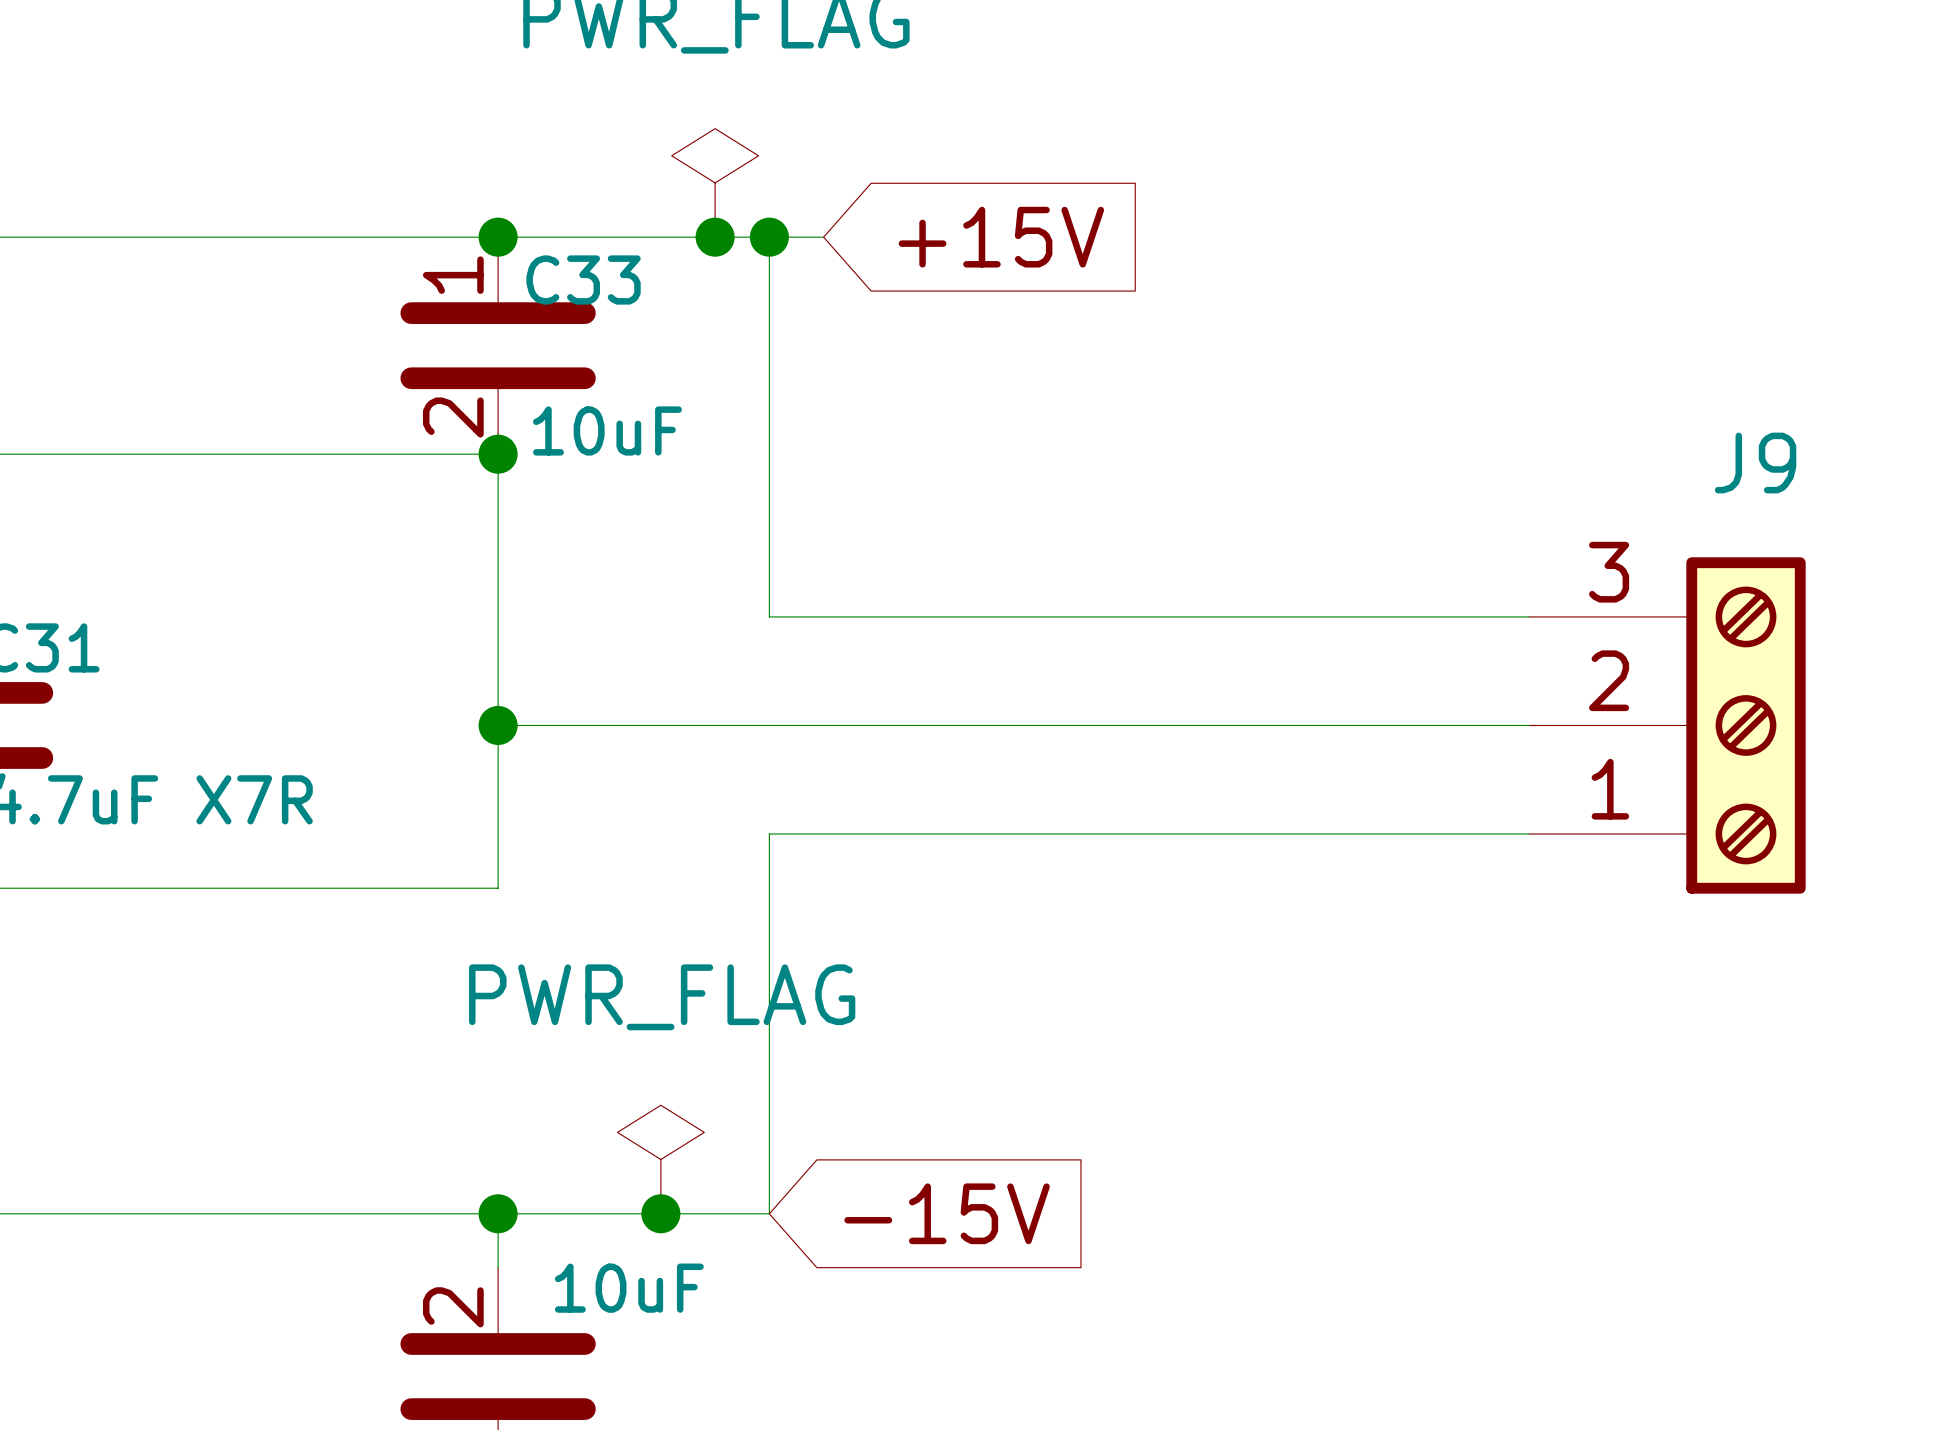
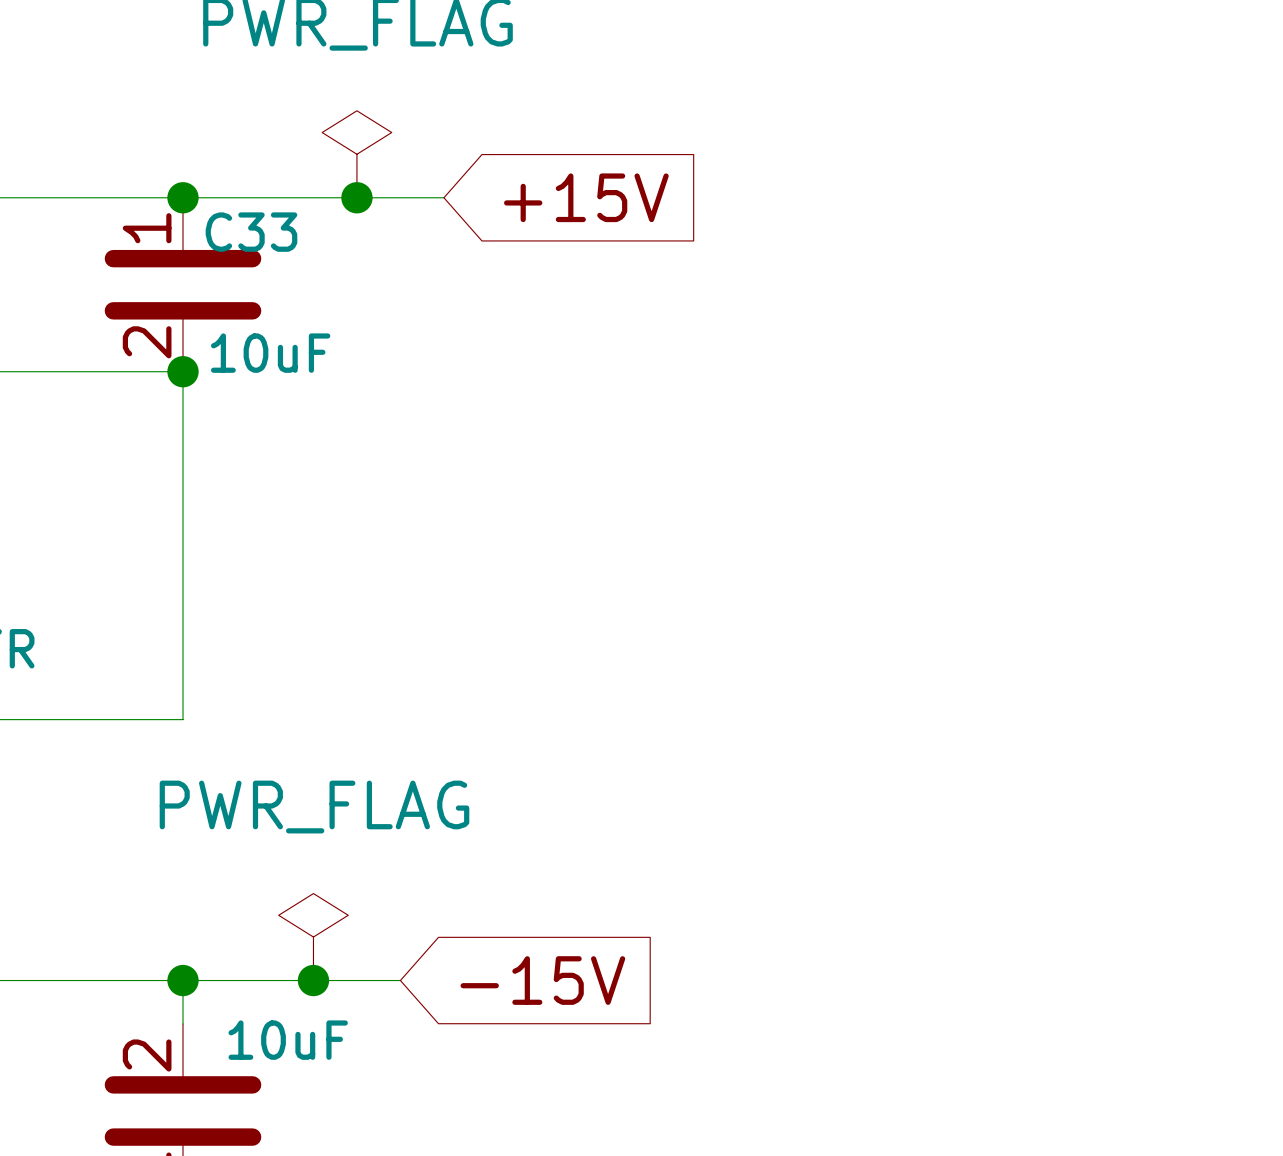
wire: (769, 237) (769, 616) (1528, 616) -> none
junction: (769, 237) -> none
wire: (498, 725) (1528, 725) -> none
junction: (498, 725) -> none
J9: (1667, 725) -> none
wire: (1528, 833) (769, 833) (769, 1213) -> none

